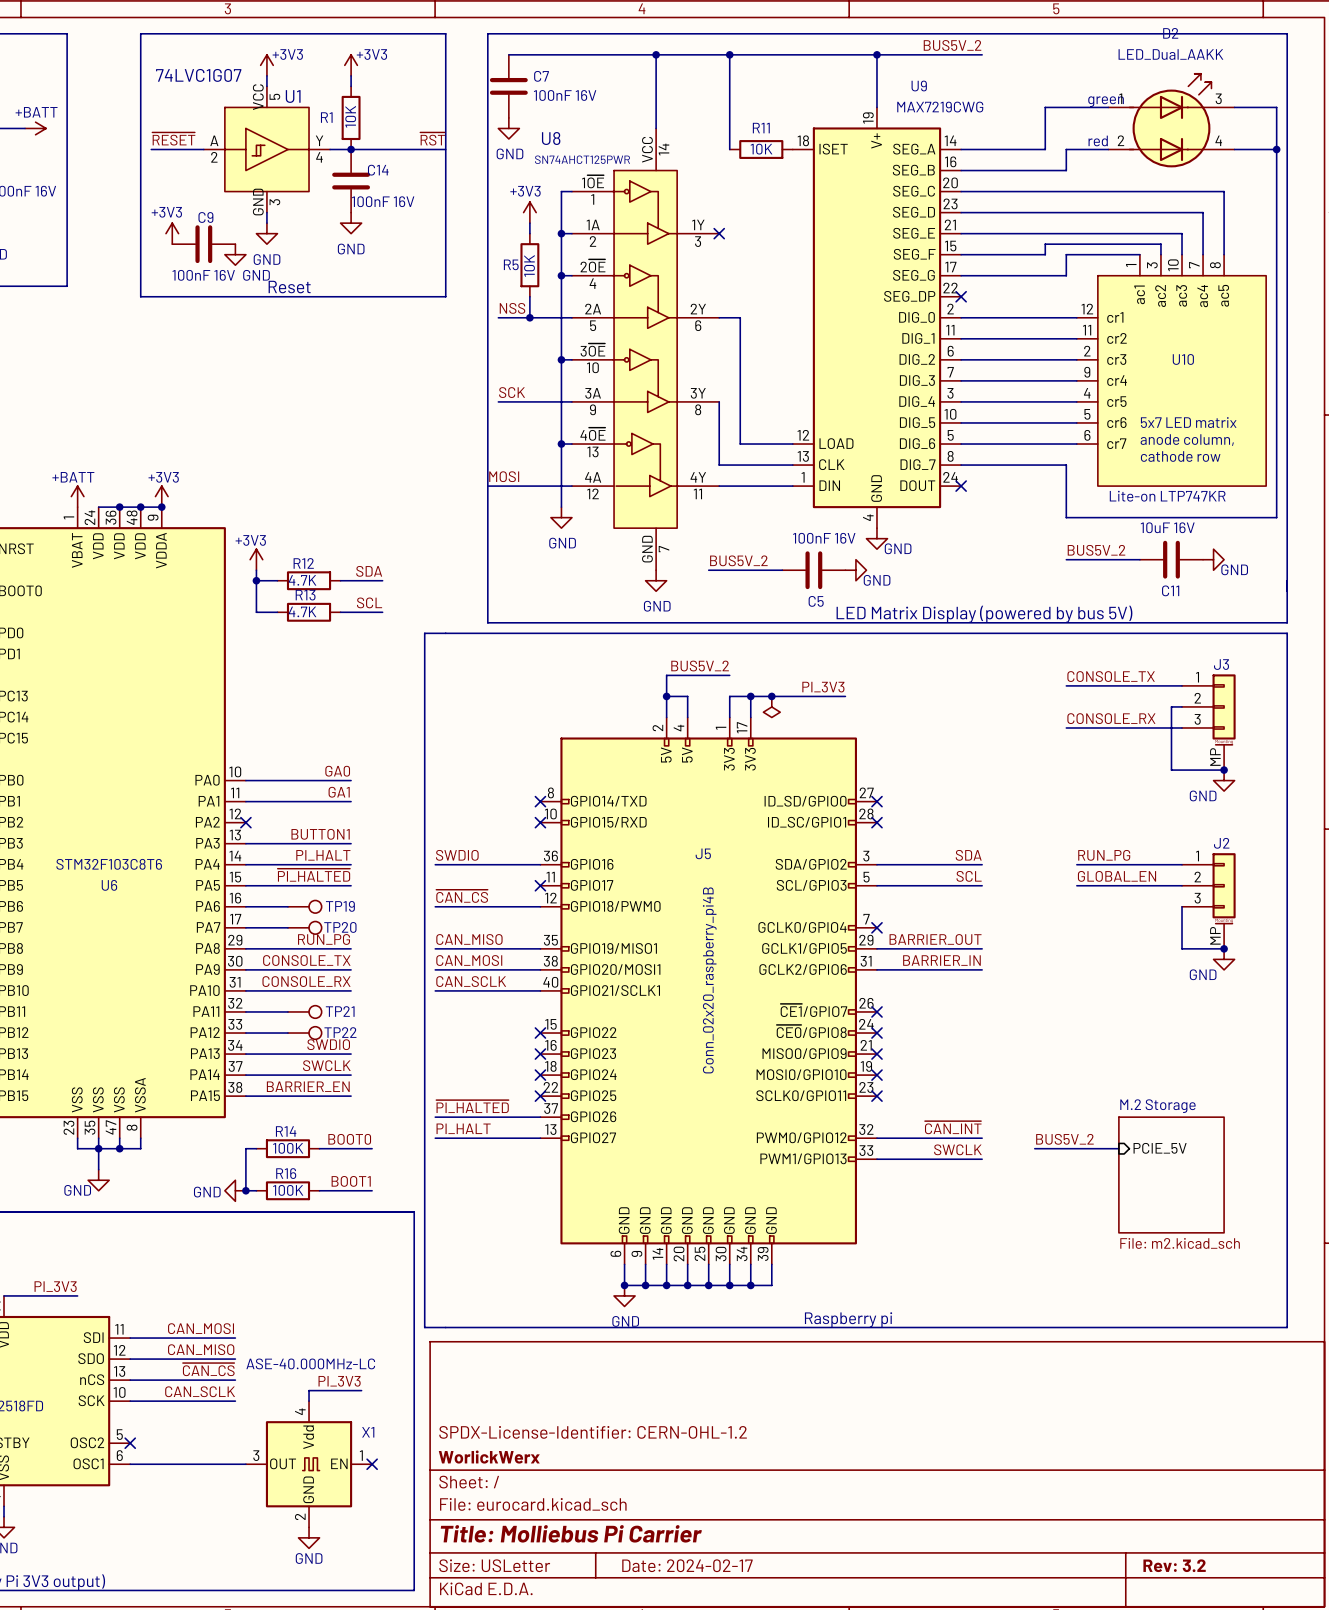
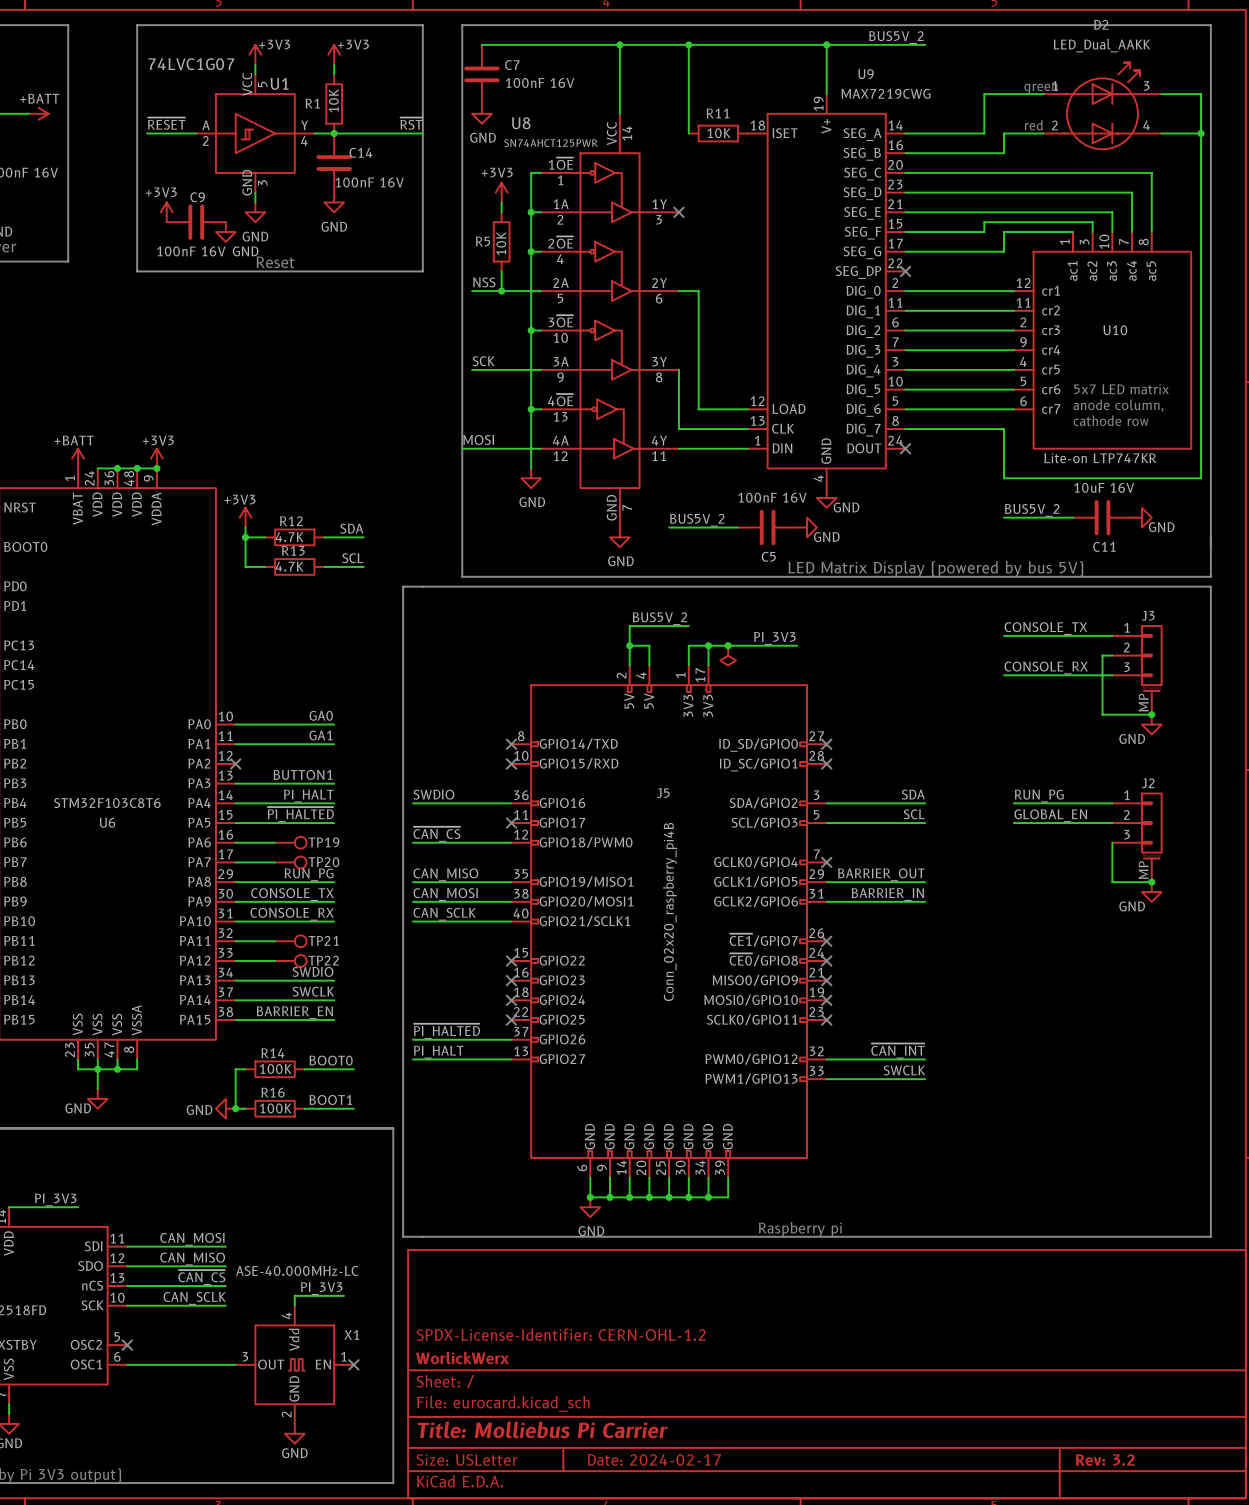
label: BUS5V_2 (1064, 1139) -> none
wire: (1034, 1148) (1118, 1148) -> none
sheet pin: PCIE_5V (1160, 1148) -> none
sheet M.2 Storage: File: m2.kicad_sch (1171, 1175) -> none

